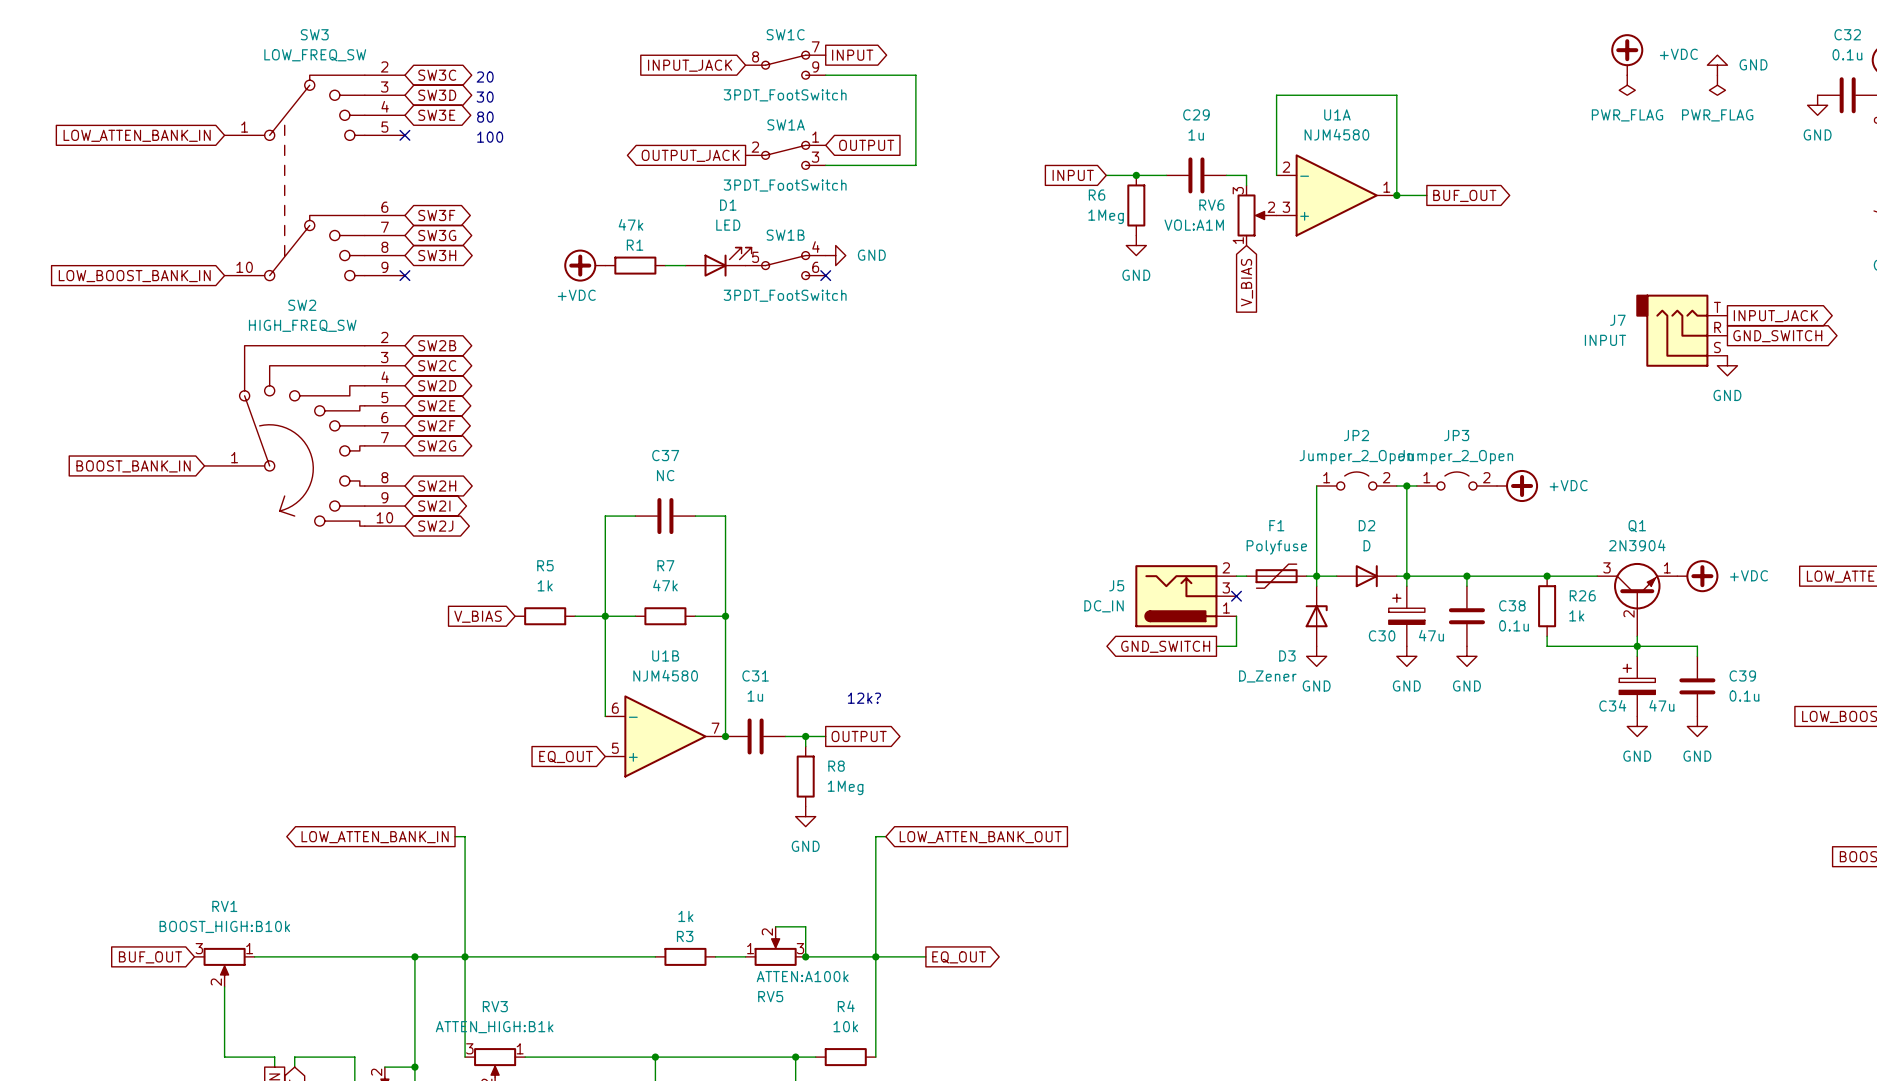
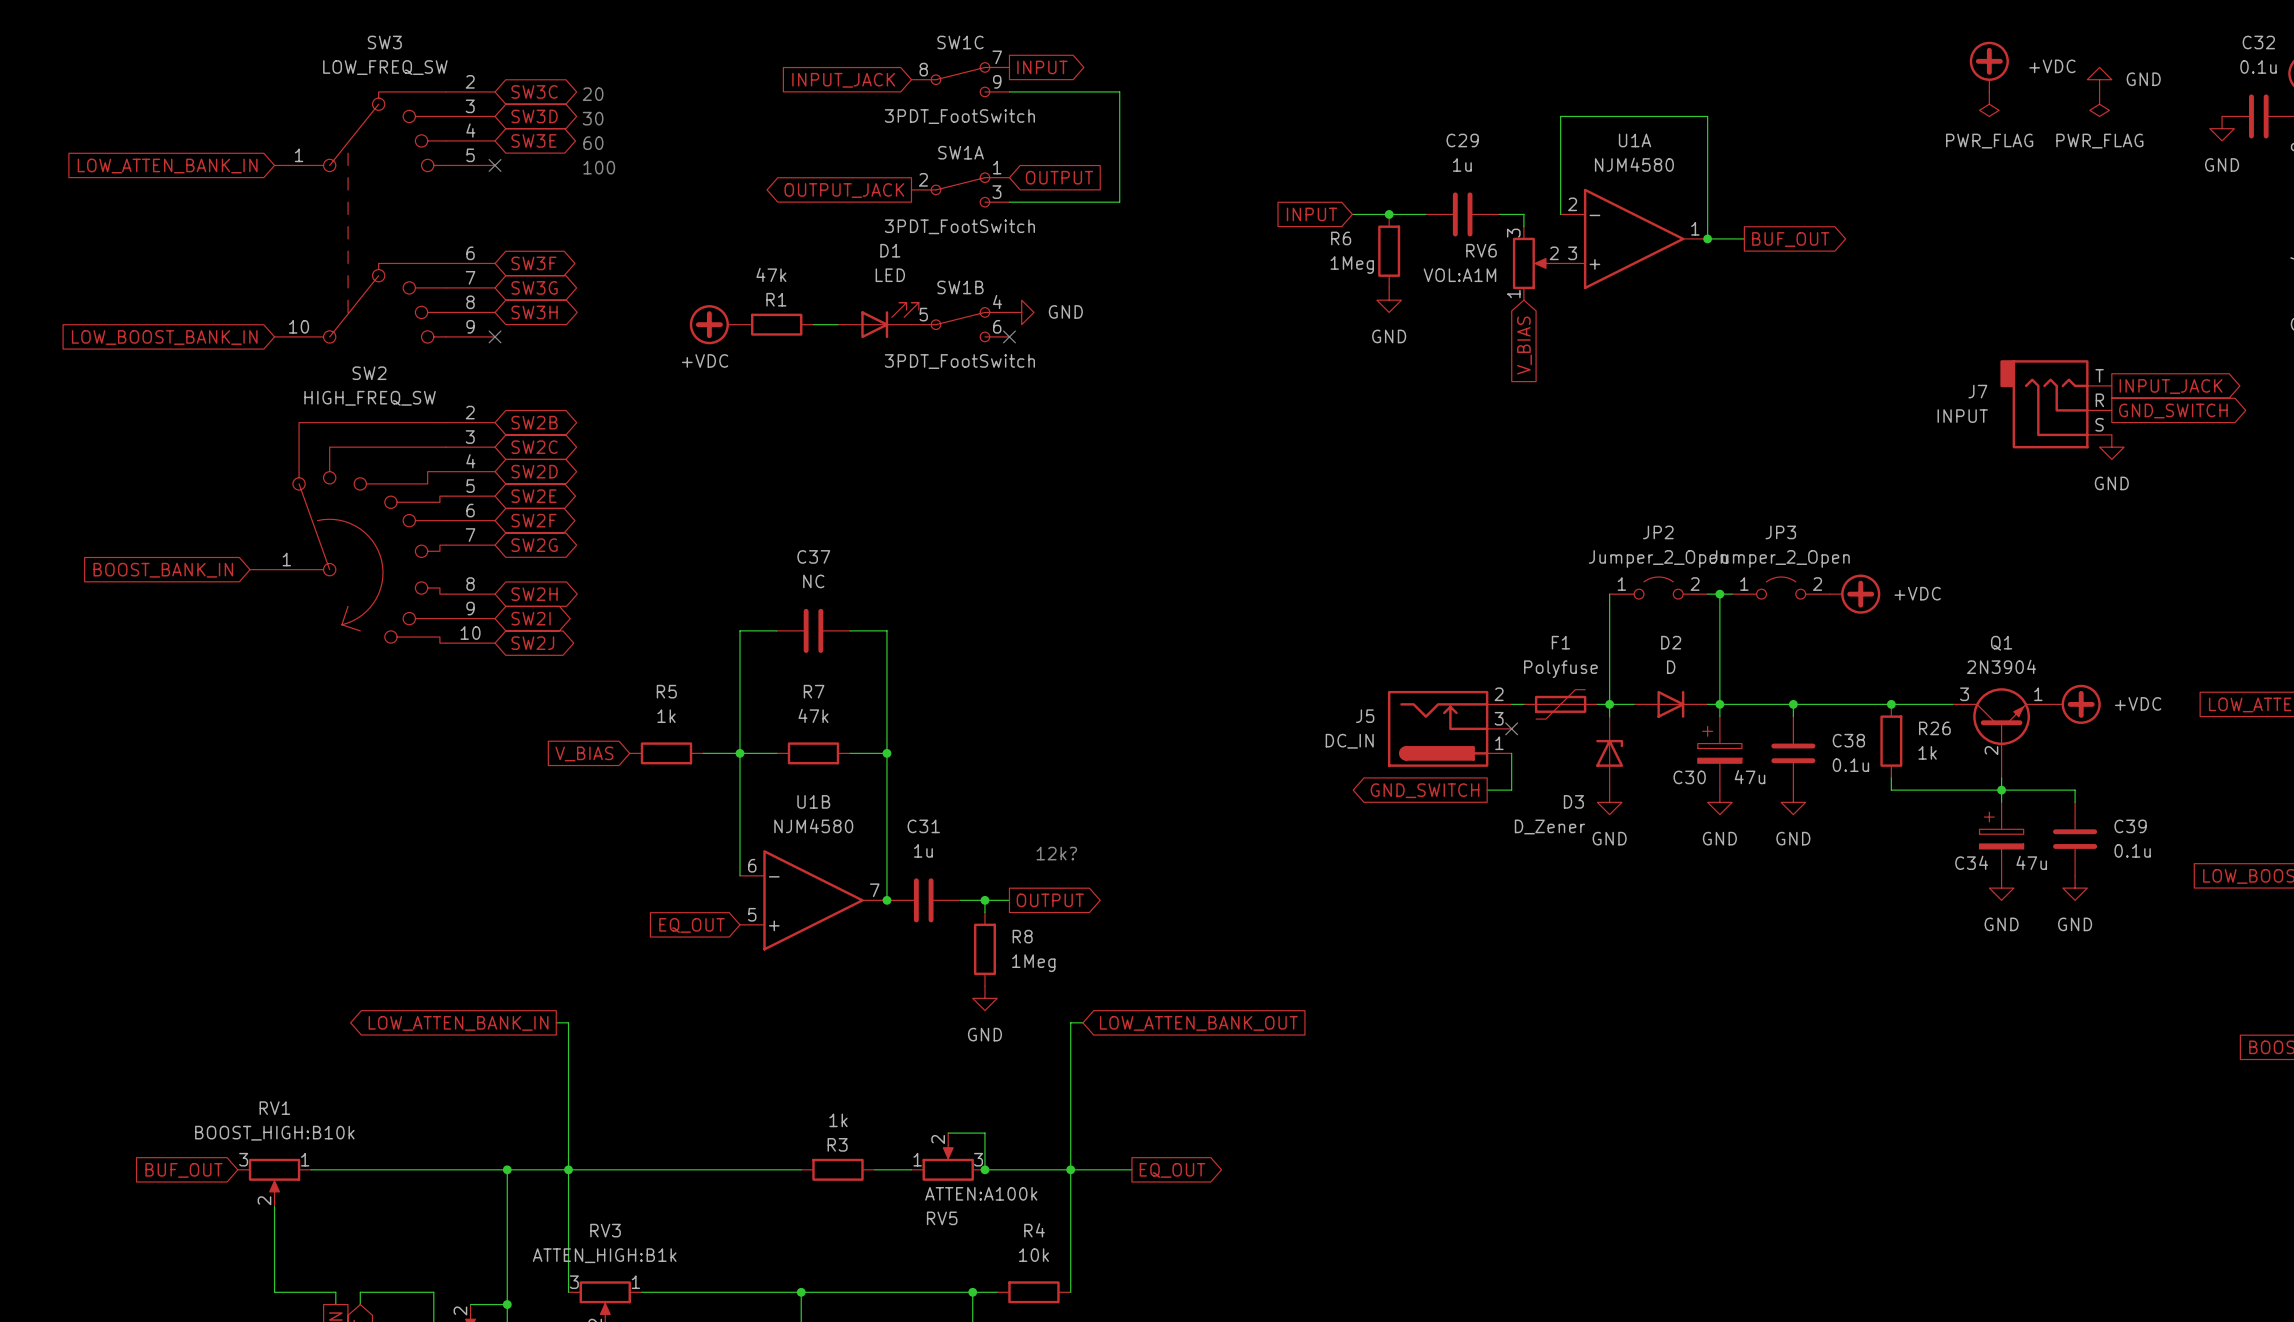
text: 80 (485, 117) -> 60 (593, 143)

